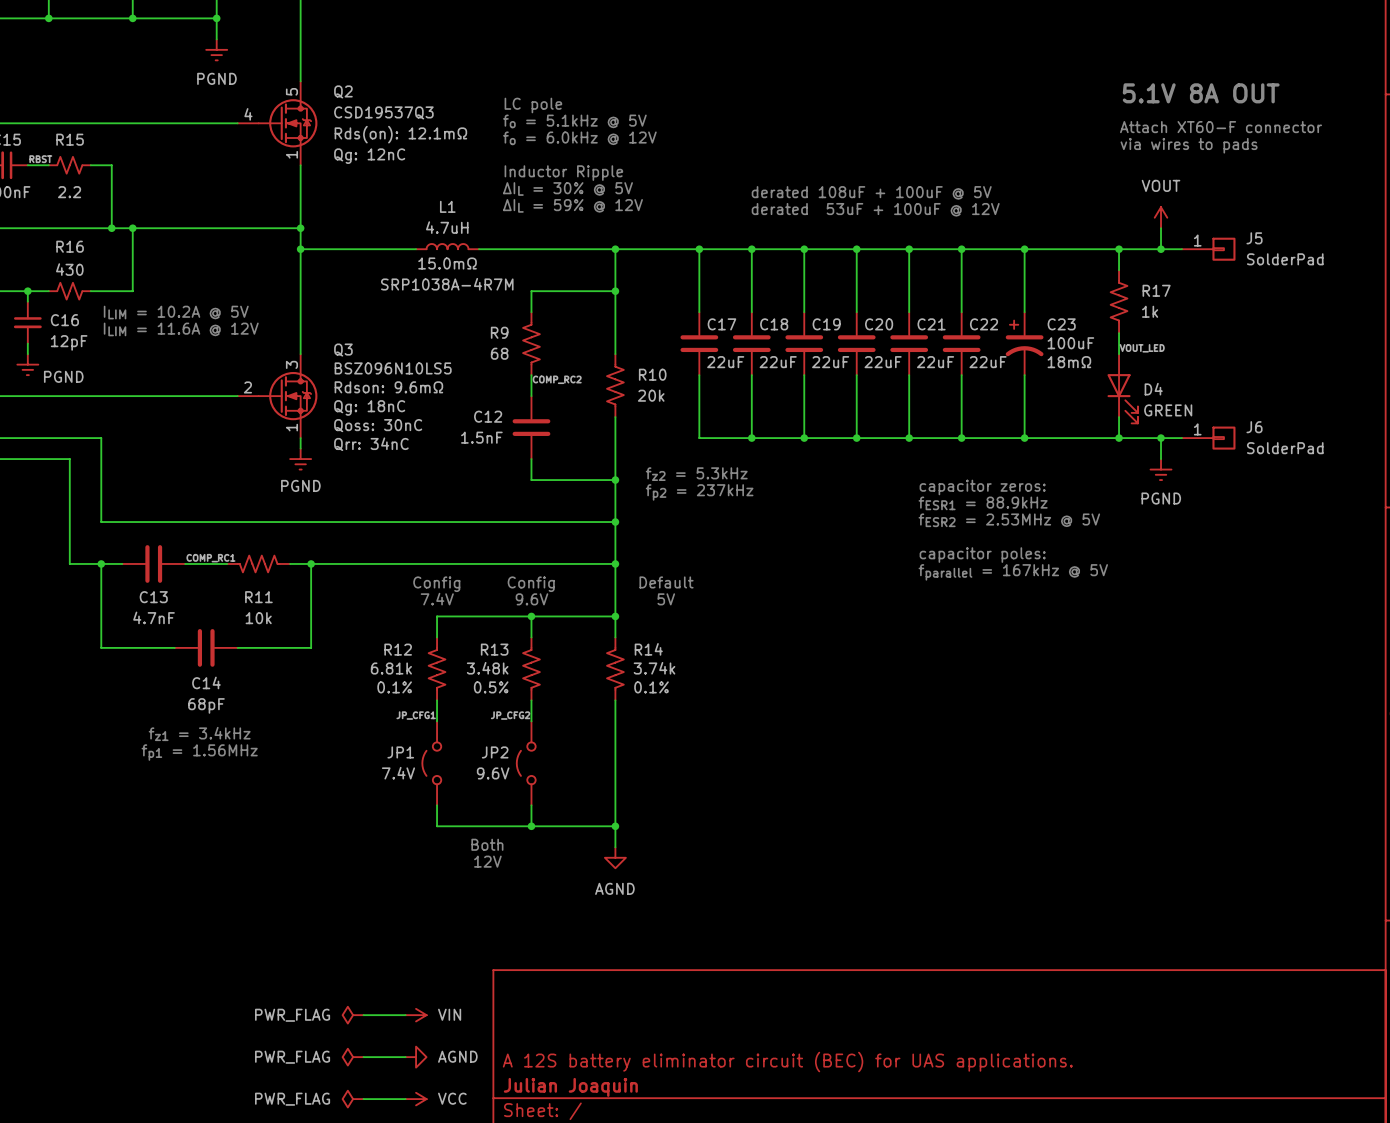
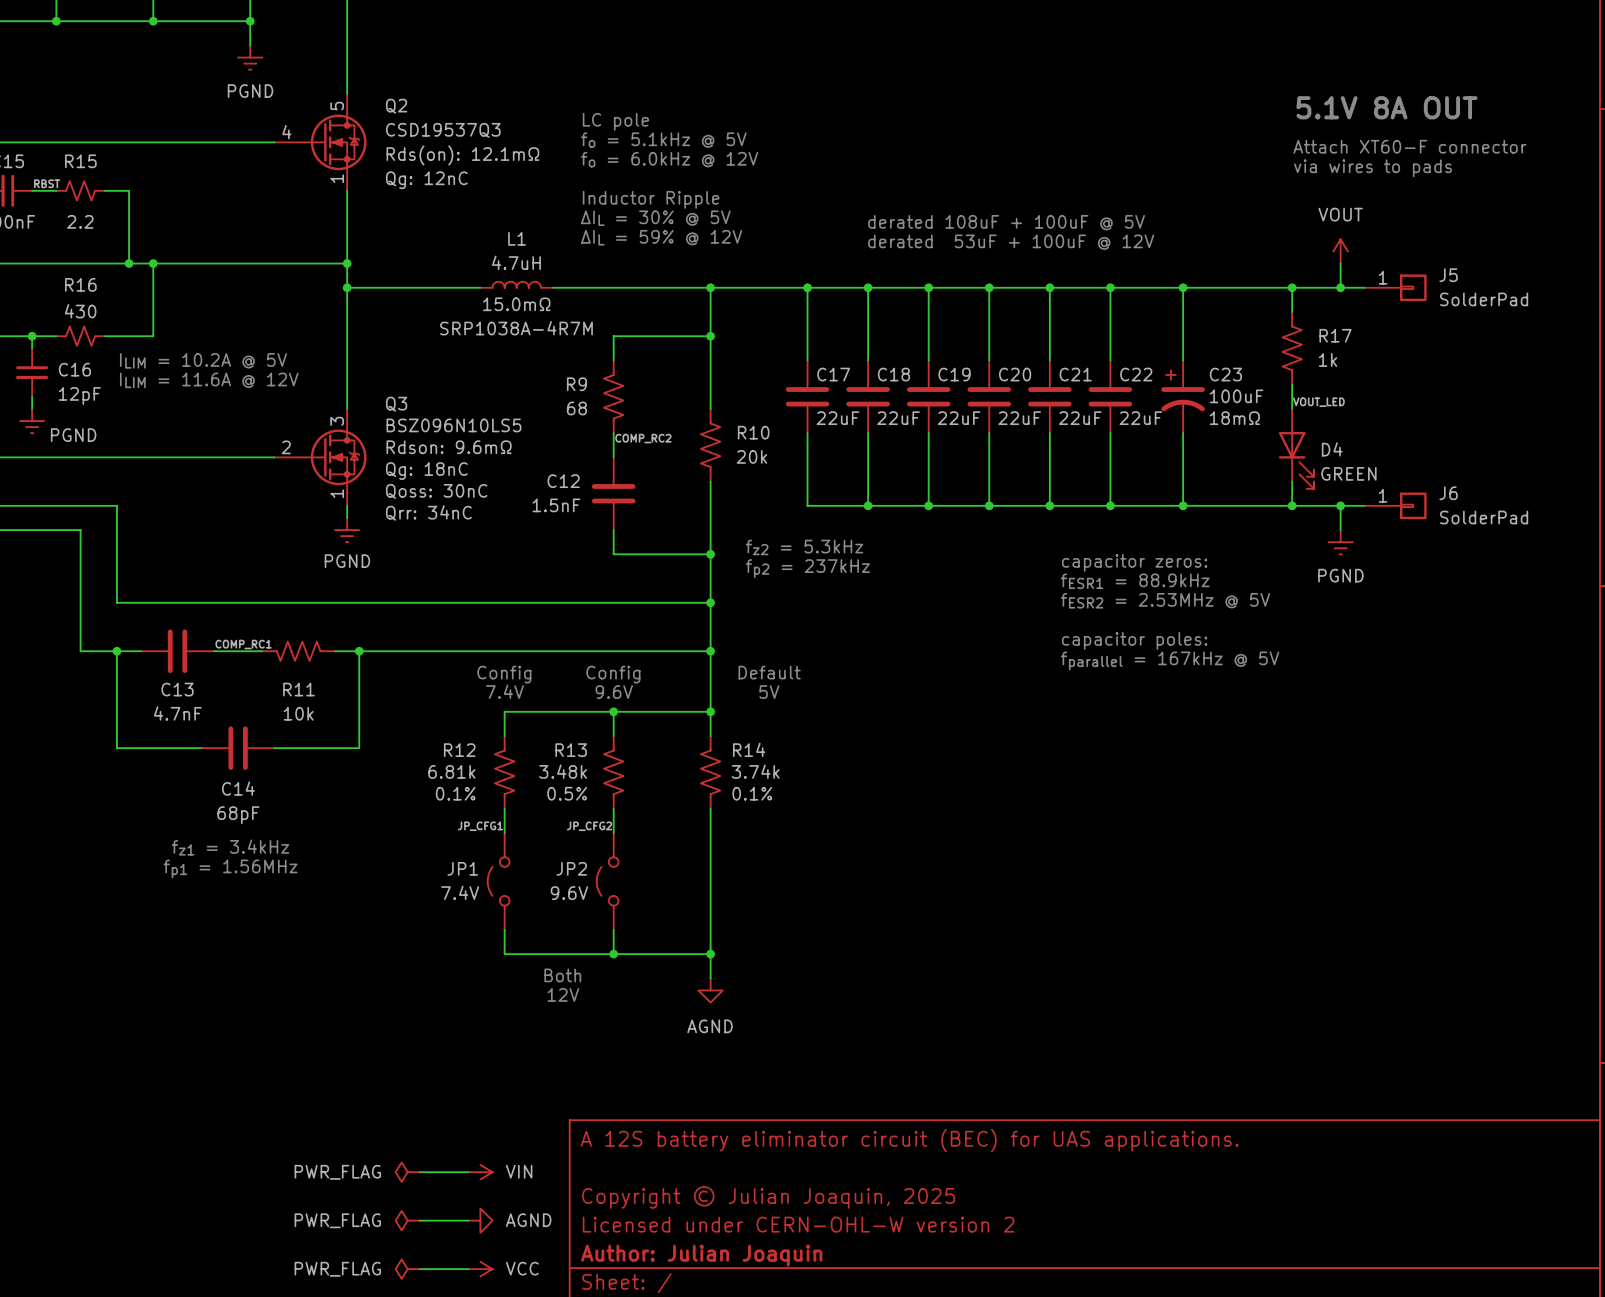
title block: none -> A 12S battery eliminator circuit (BEC) for UAS applications. (909, 1140)
title block: none -> Copyright © Julian Joaquin, 2025 (768, 1197)
title block: A 12S battery eliminator circuit (BEC) for UAS applications. (787, 1062) -> Licensed under CERN-OHL-W version 2 (798, 1224)
title block: Julian Joaquin (570, 1087) -> Author: Julian Joaquin (701, 1255)

